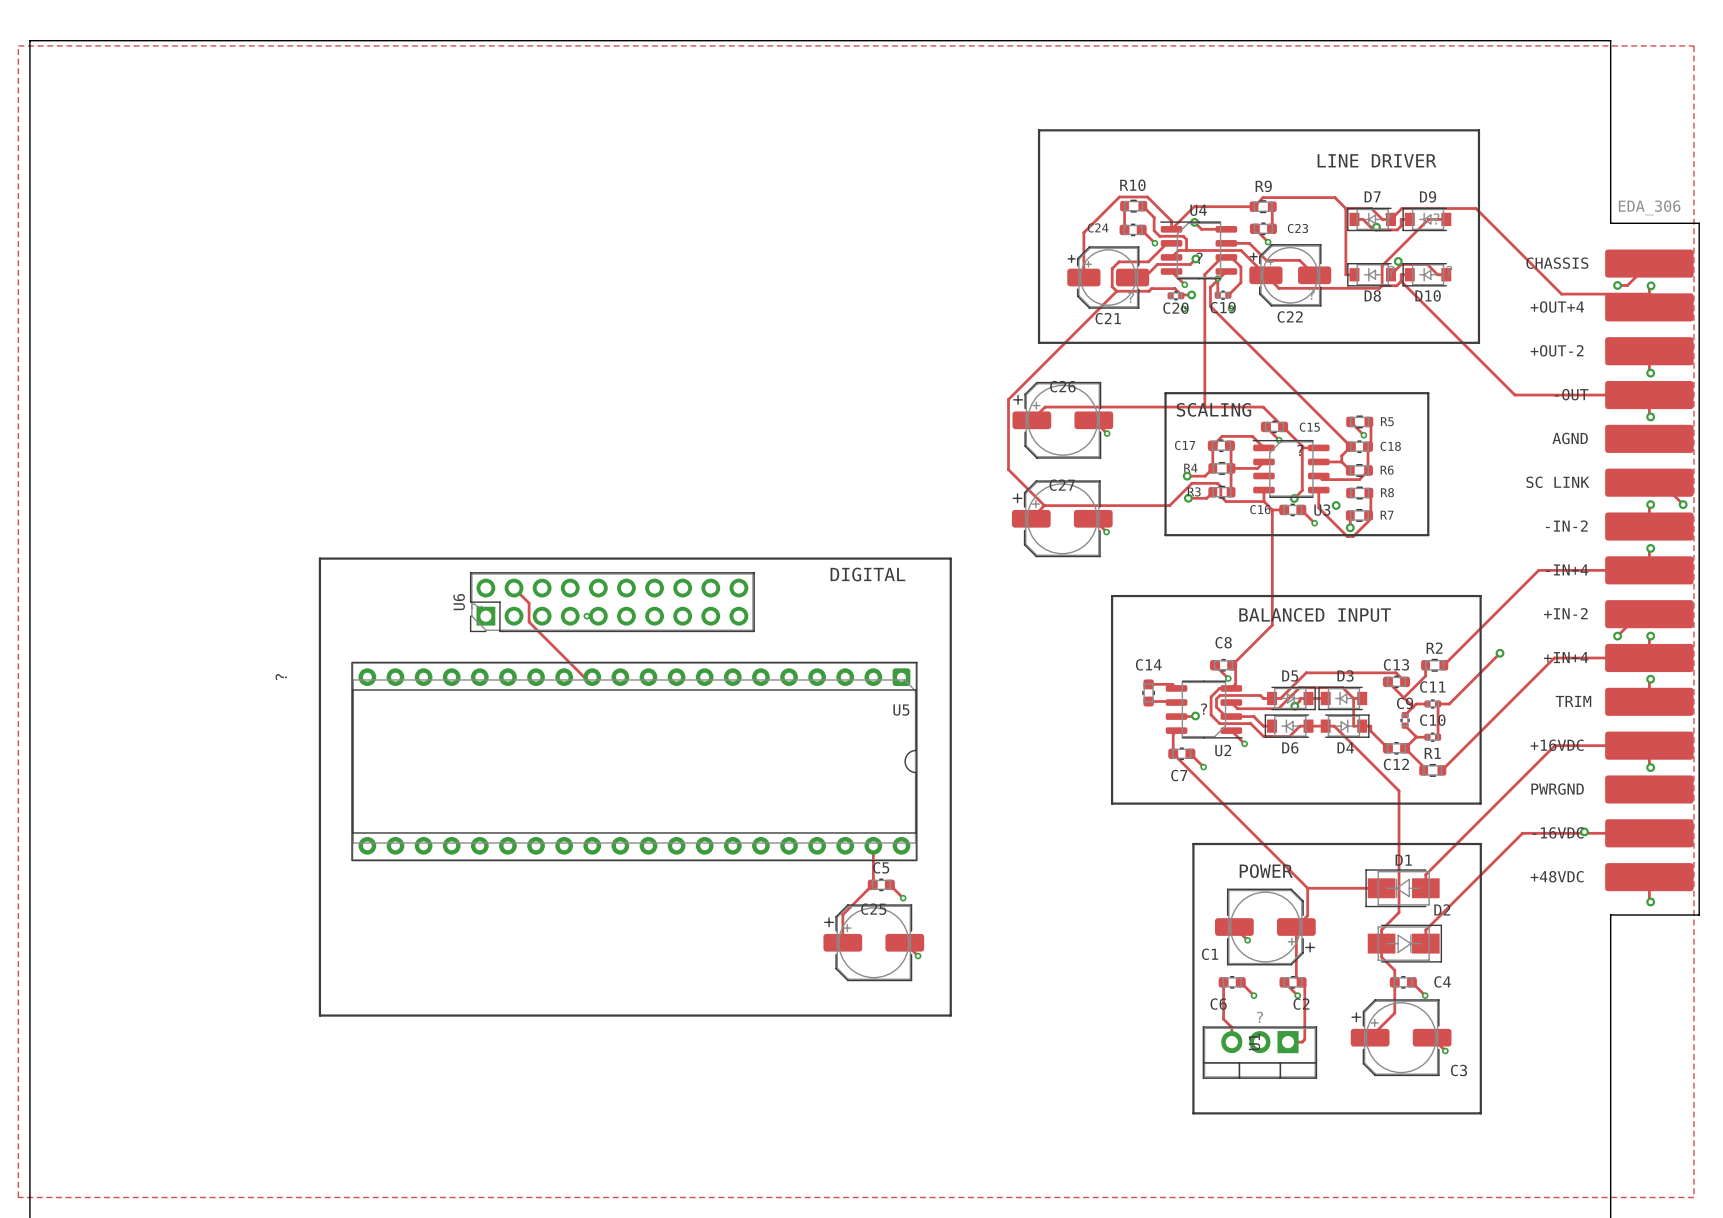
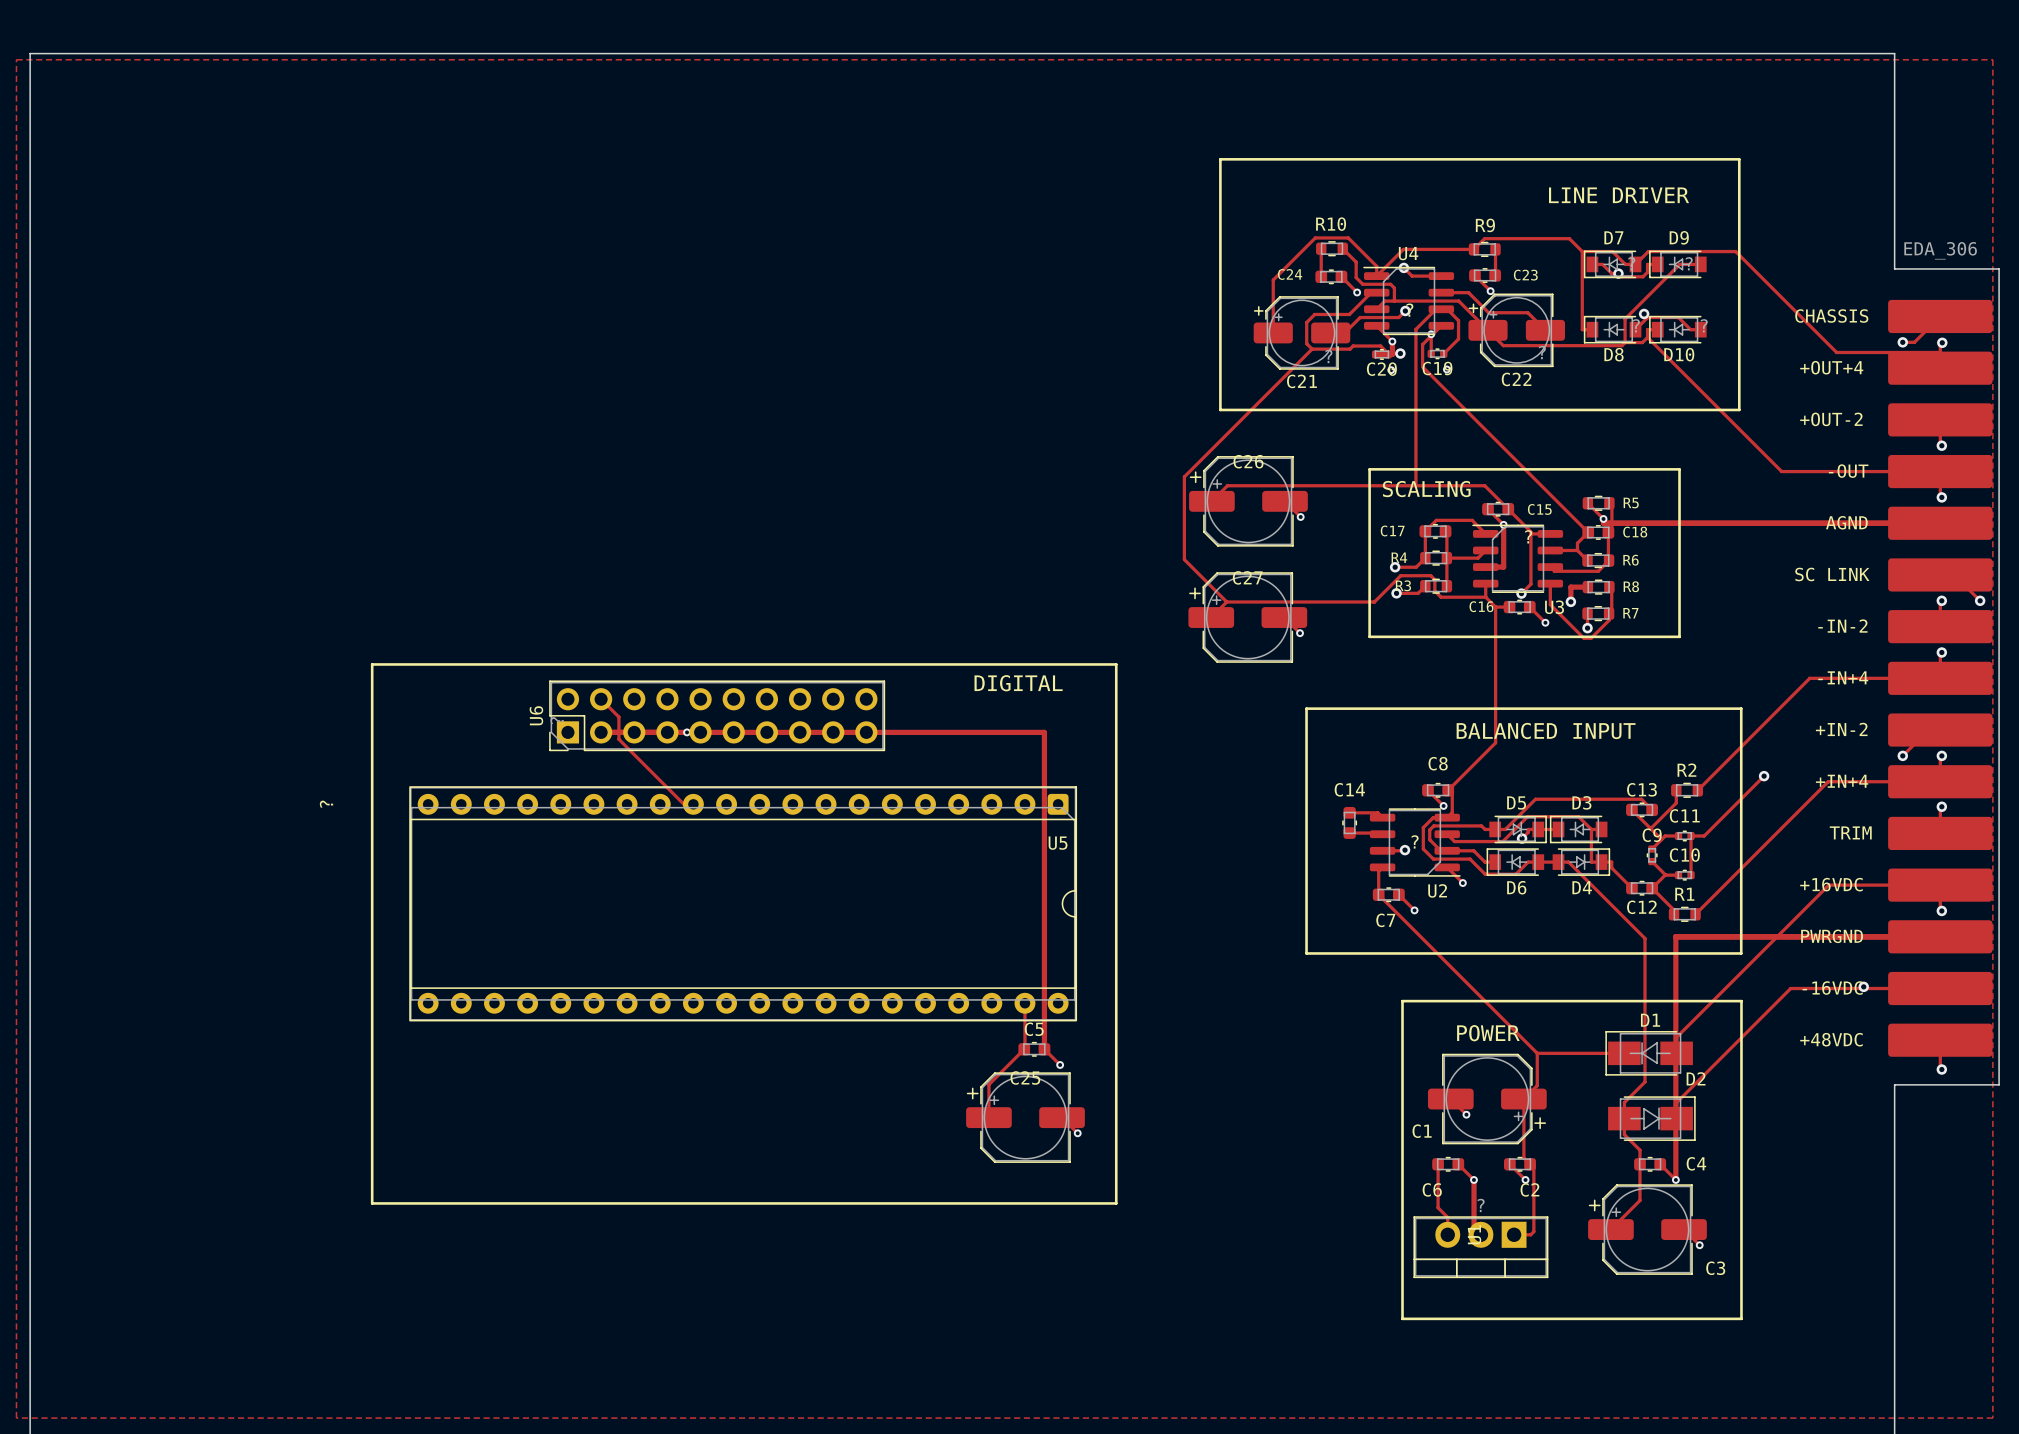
track: none -> (1392, 341) (1392, 354) (1375, 354)
track: none -> (1603, 518) (1603, 523) (1940, 523)
track: none -> (1503, 524) (1503, 567) (1485, 567)
track: none -> (1587, 587) (1570, 587) (1570, 601)
track: none -> (601, 732) (1044, 732) (1044, 1049)
track: none -> (1940, 936) (1675, 936) (1675, 1180)
track: none -> (1474, 1180) (1474, 1234) (1480, 1234)

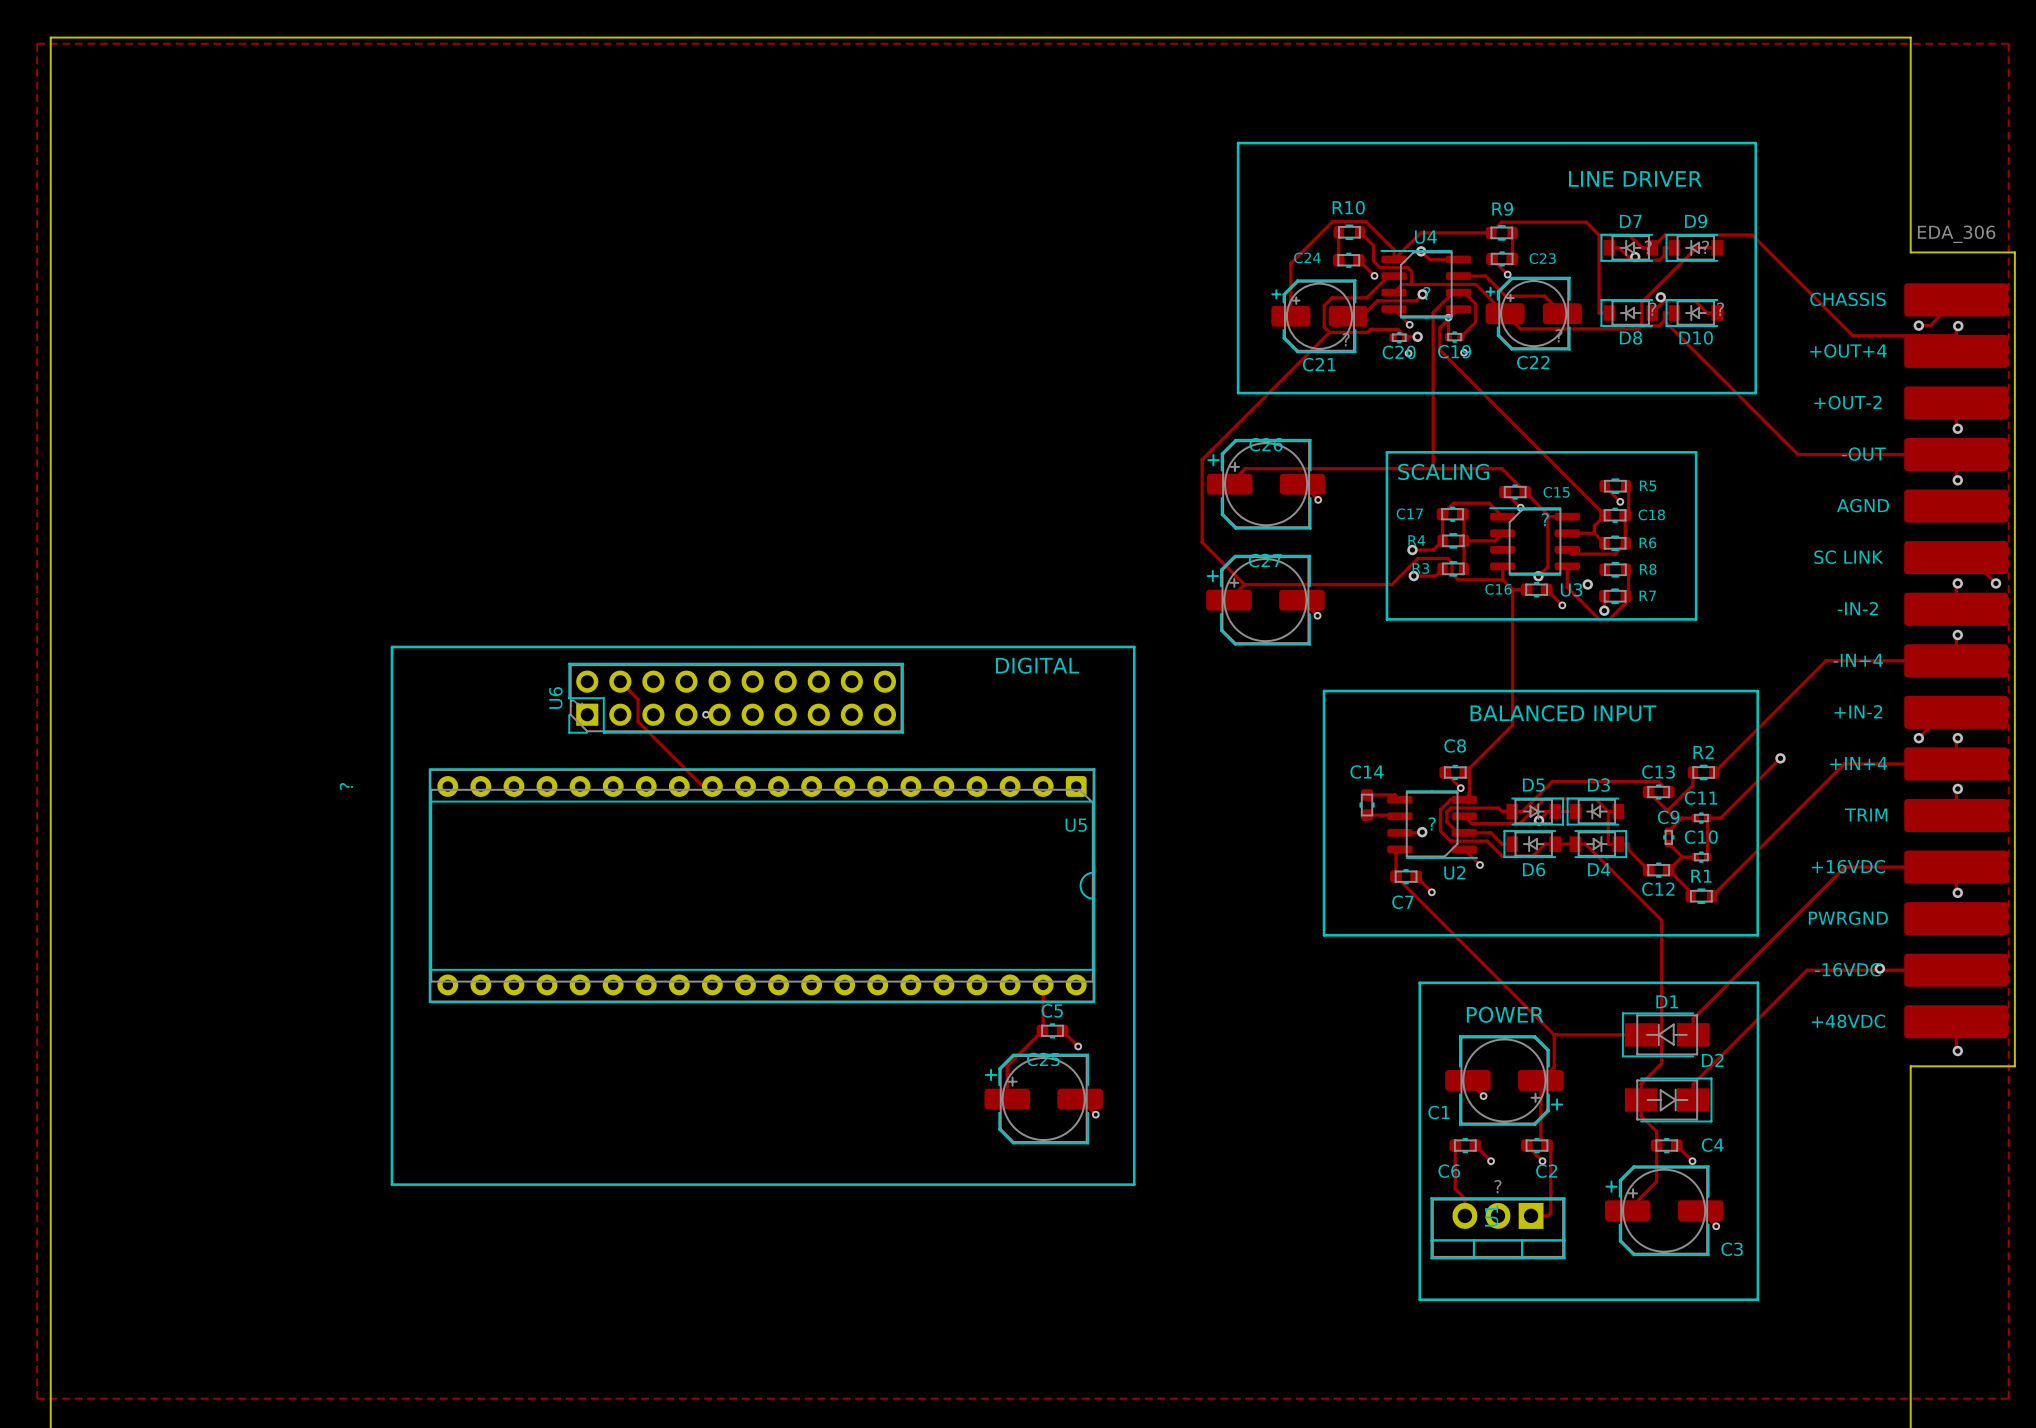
track: (1392, 341) (1392, 354) (1375, 354) -> none
track: (1603, 518) (1603, 523) (1940, 523) -> none
track: (1503, 524) (1503, 567) (1485, 567) -> none
track: (1587, 587) (1570, 587) (1570, 601) -> none
track: (601, 732) (1044, 732) (1044, 1049) -> none
track: (1940, 936) (1675, 936) (1675, 1180) -> none
track: (1474, 1180) (1474, 1234) (1480, 1234) -> none

